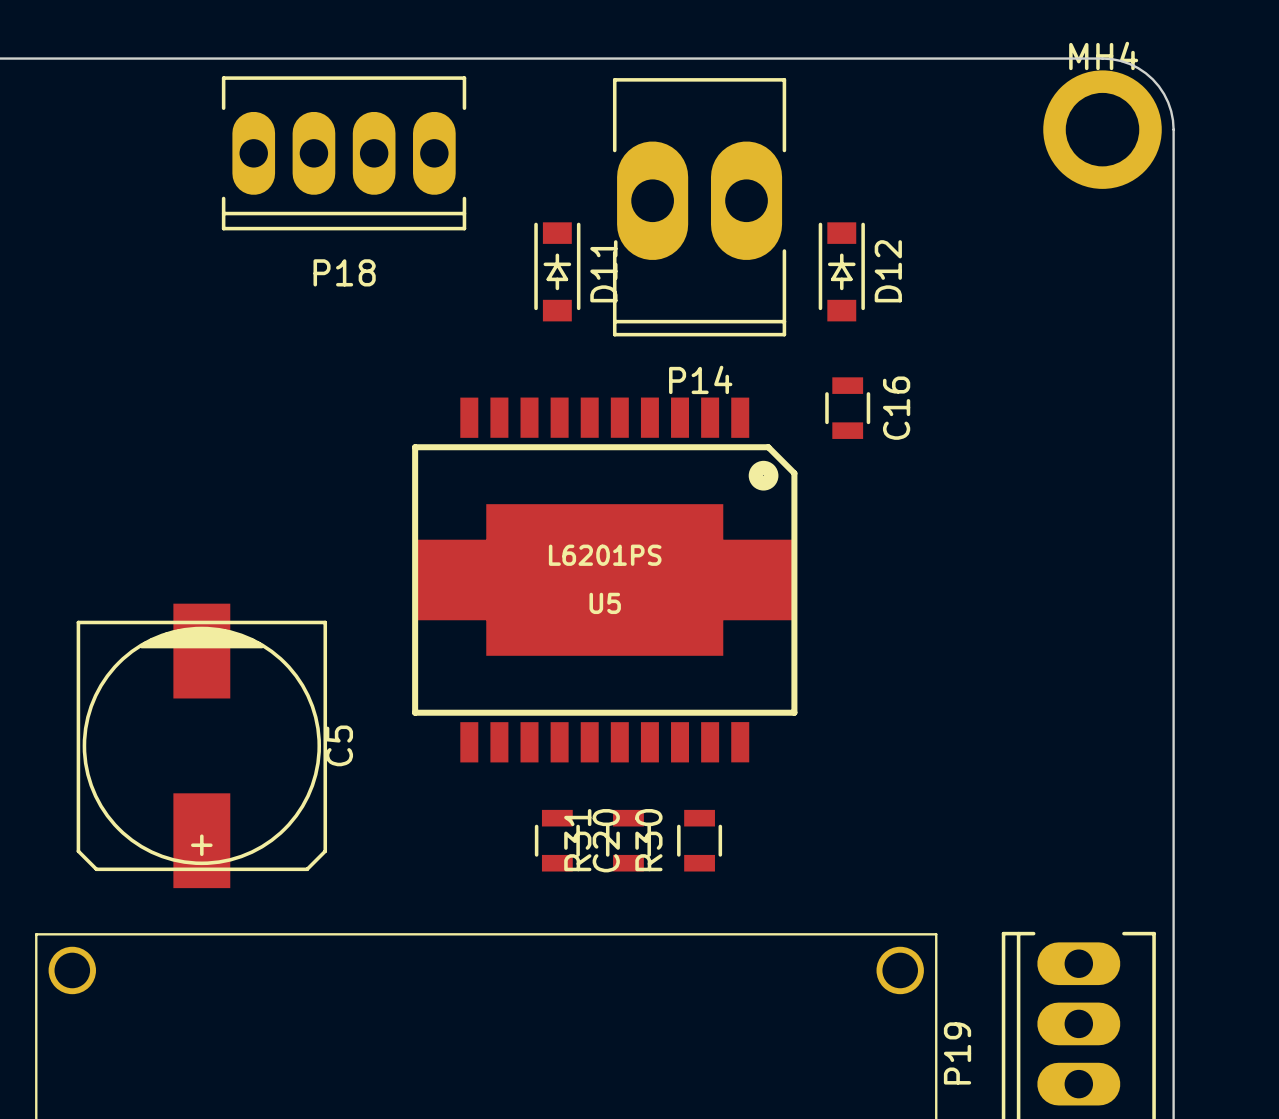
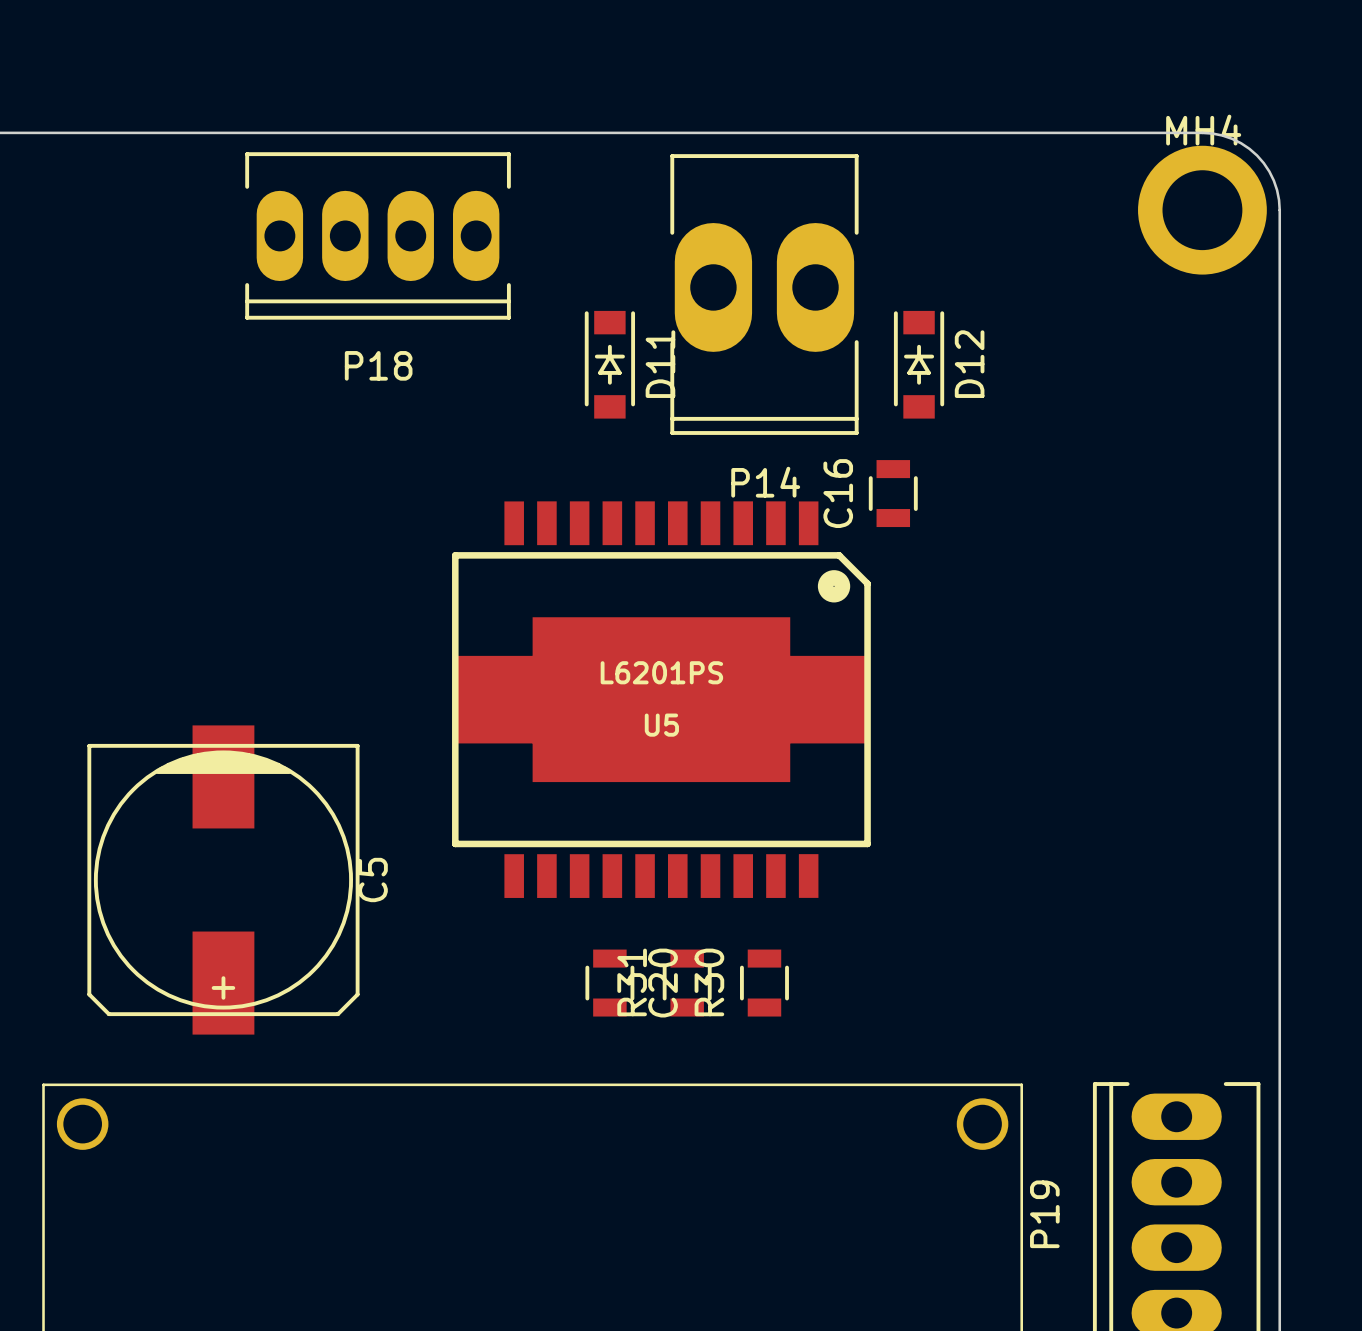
C16 position: (847, 408) -> (893, 493)
C16 name position: C16 (896, 408) -> C16 (838, 493)

